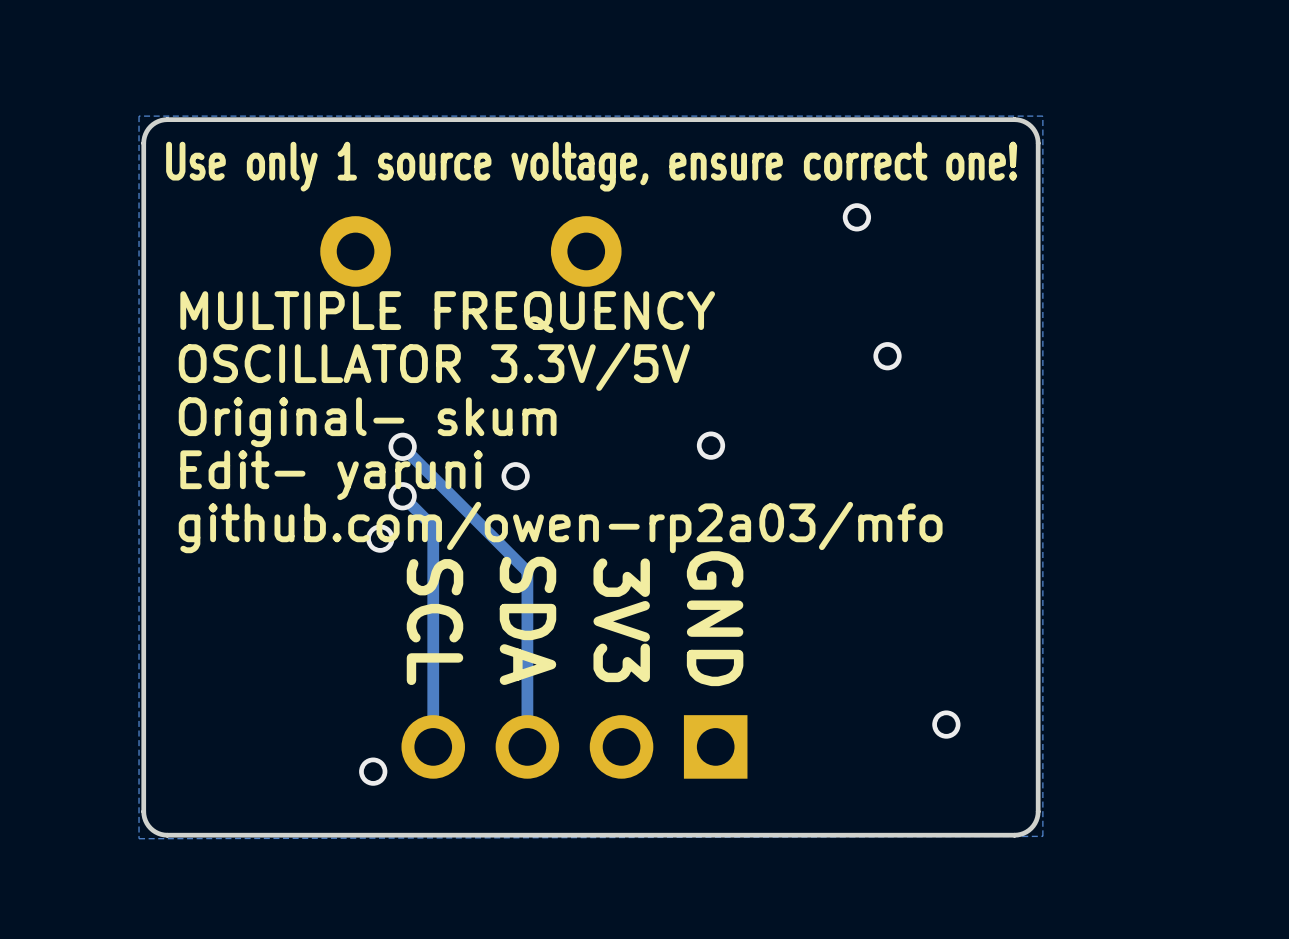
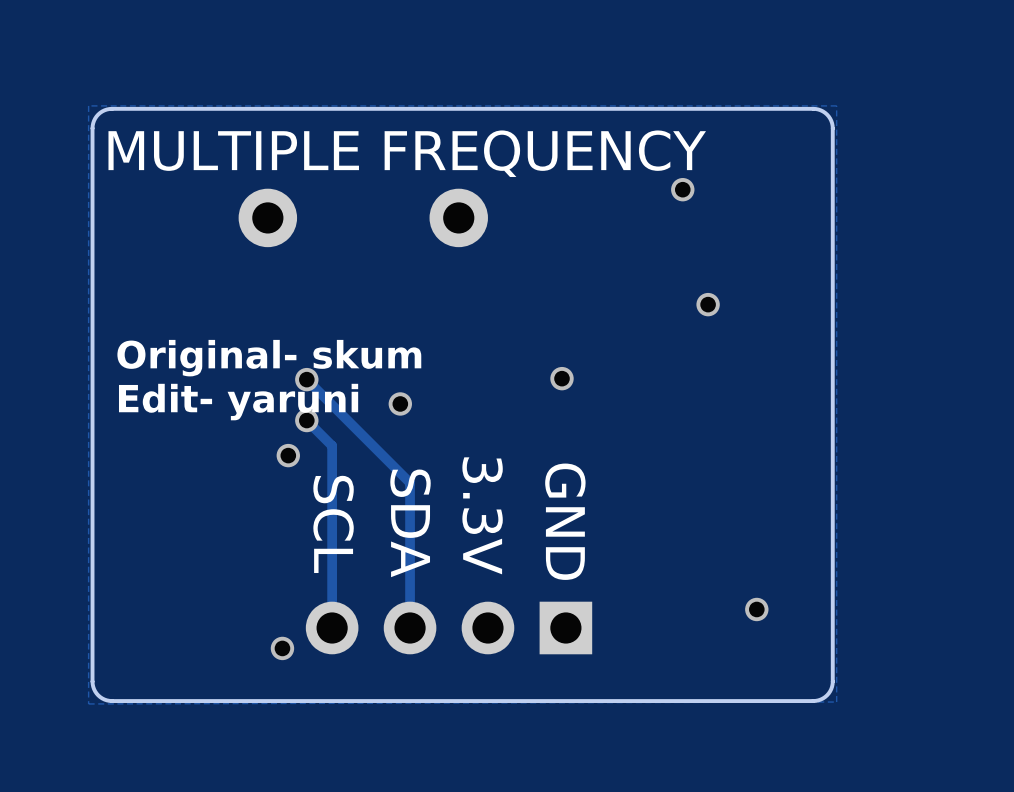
text: Use only 1 source voltage, ensure correct one! (591, 166) -> MULTIPLE FREQUENCY (407, 153)
text: MULTIPLE FREQUENCY (447, 312) -> none
text: OSCILLATOR 3.3V/5V (434, 366) -> none
text: github.com/owen-rp2a03/mfo (560, 527) -> none
text: 3V3 (621, 620) -> 3.3V (482, 515)

